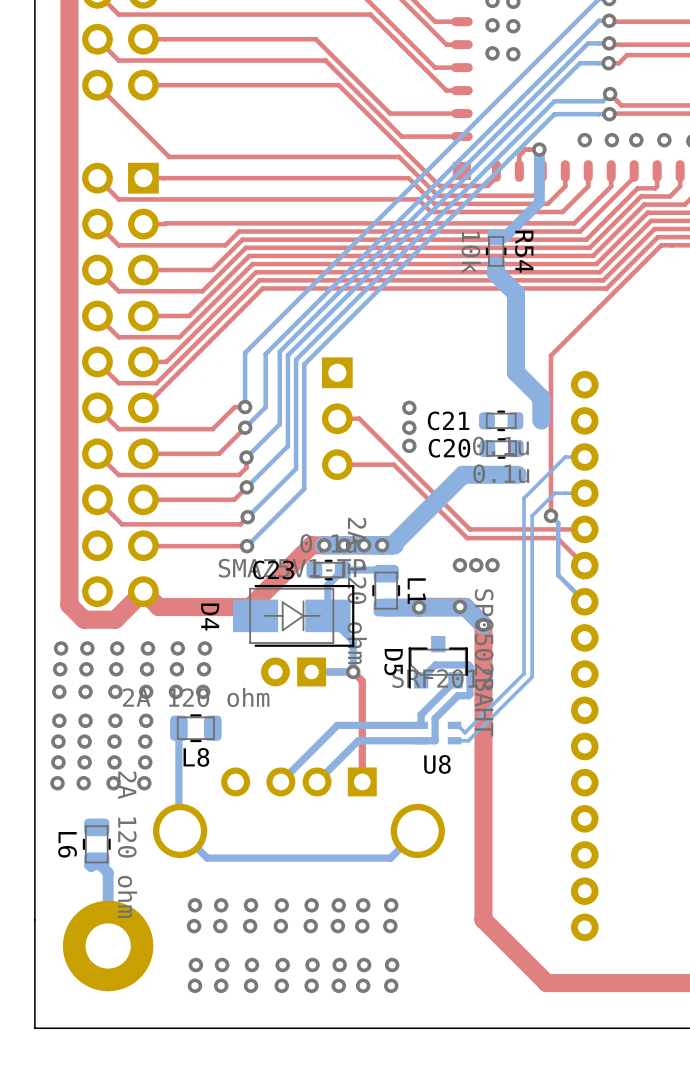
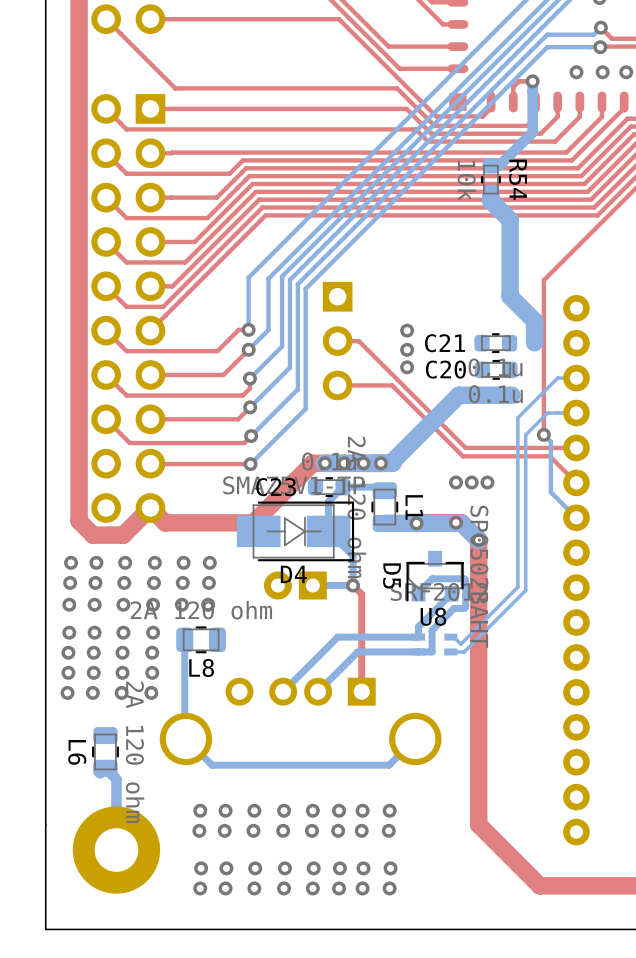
D4 name rotation: 0° (210, 617) -> 90° counterclockwise (293, 574)
D4 name position: D4 (210, 617) -> D4 (293, 574)
U8 name position: U8 (437, 764) -> U8 (433, 616)

